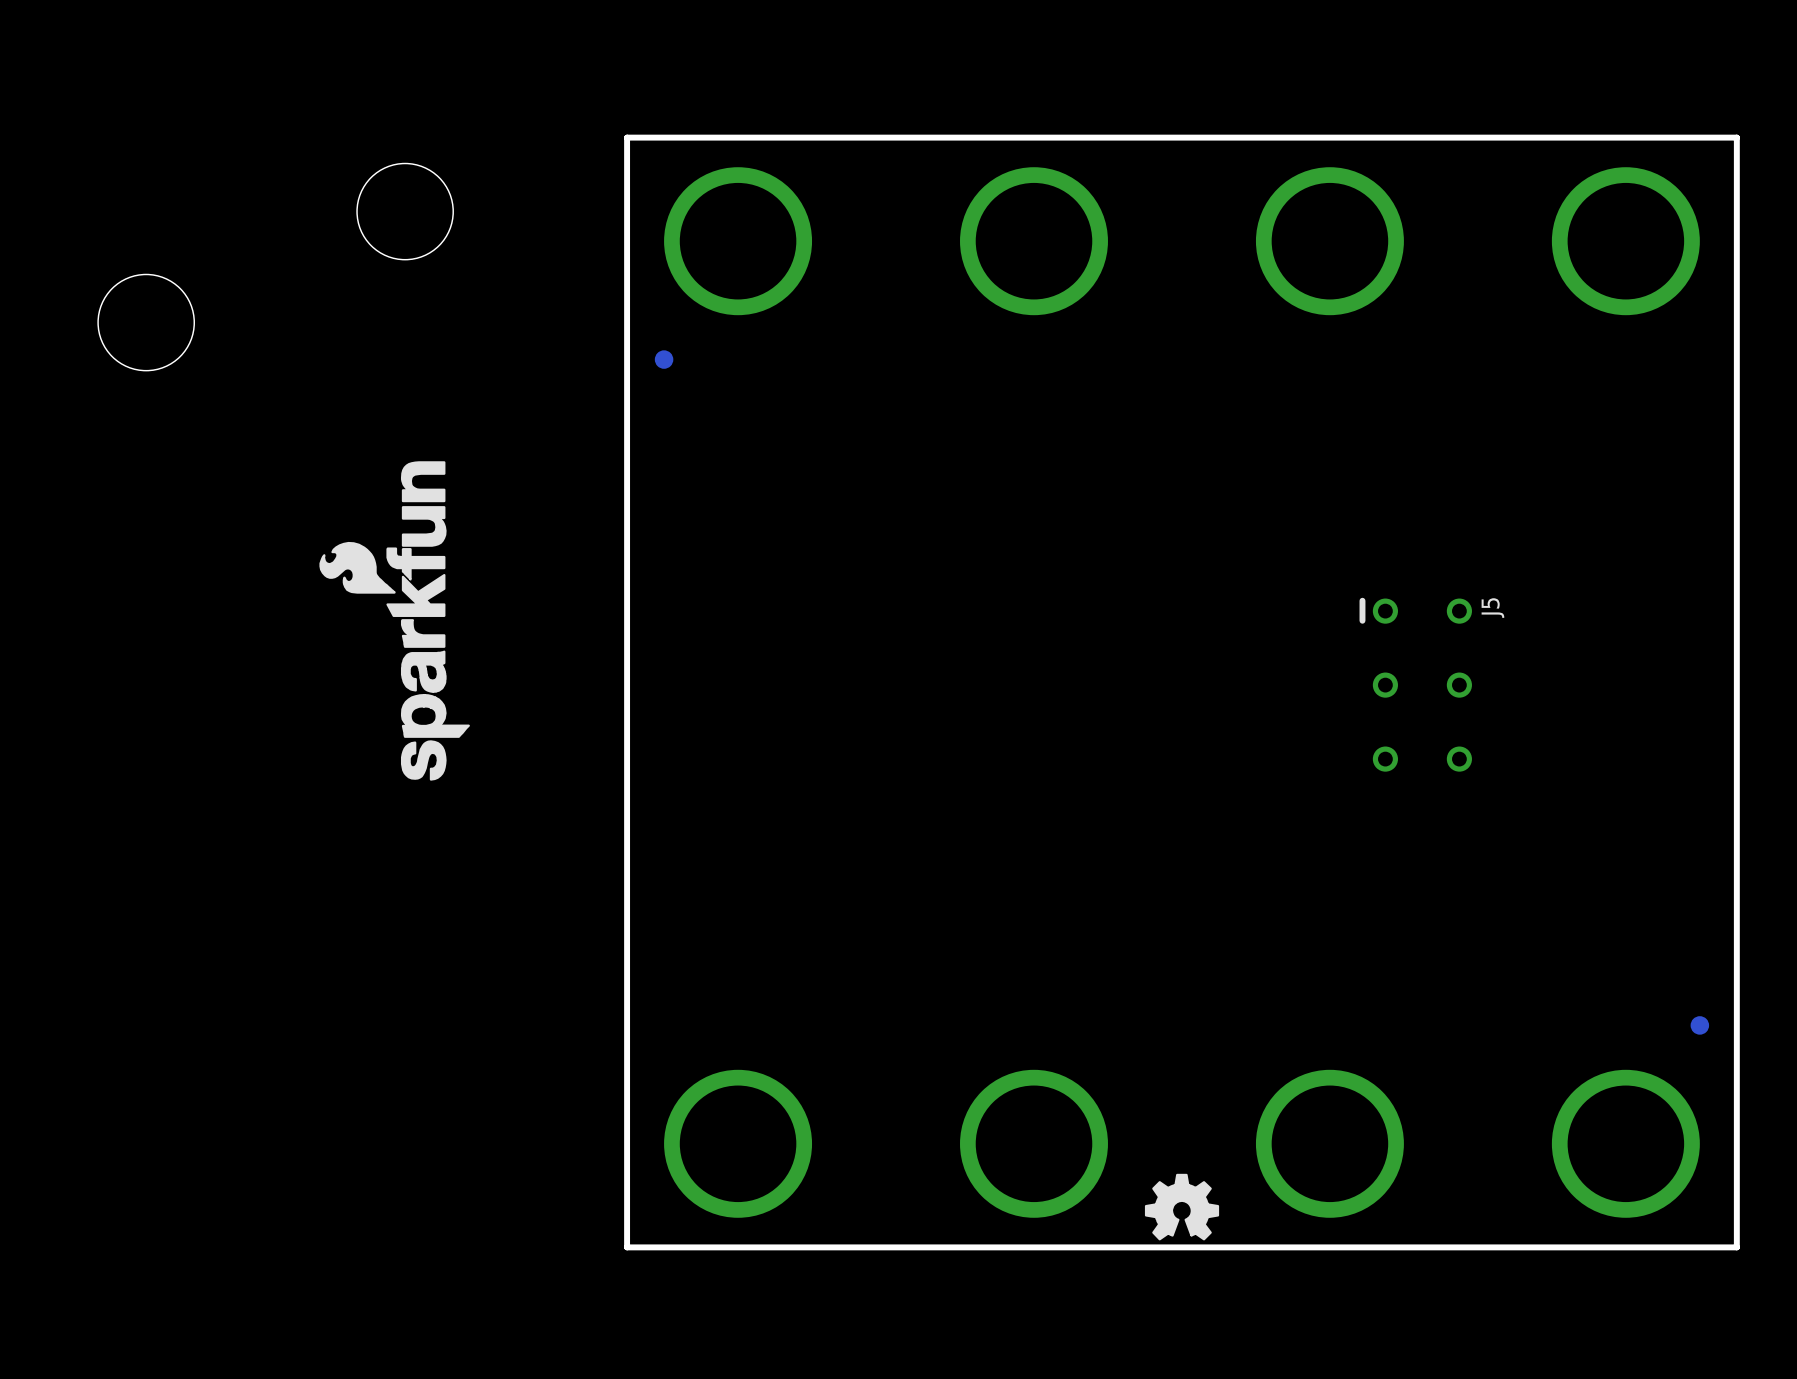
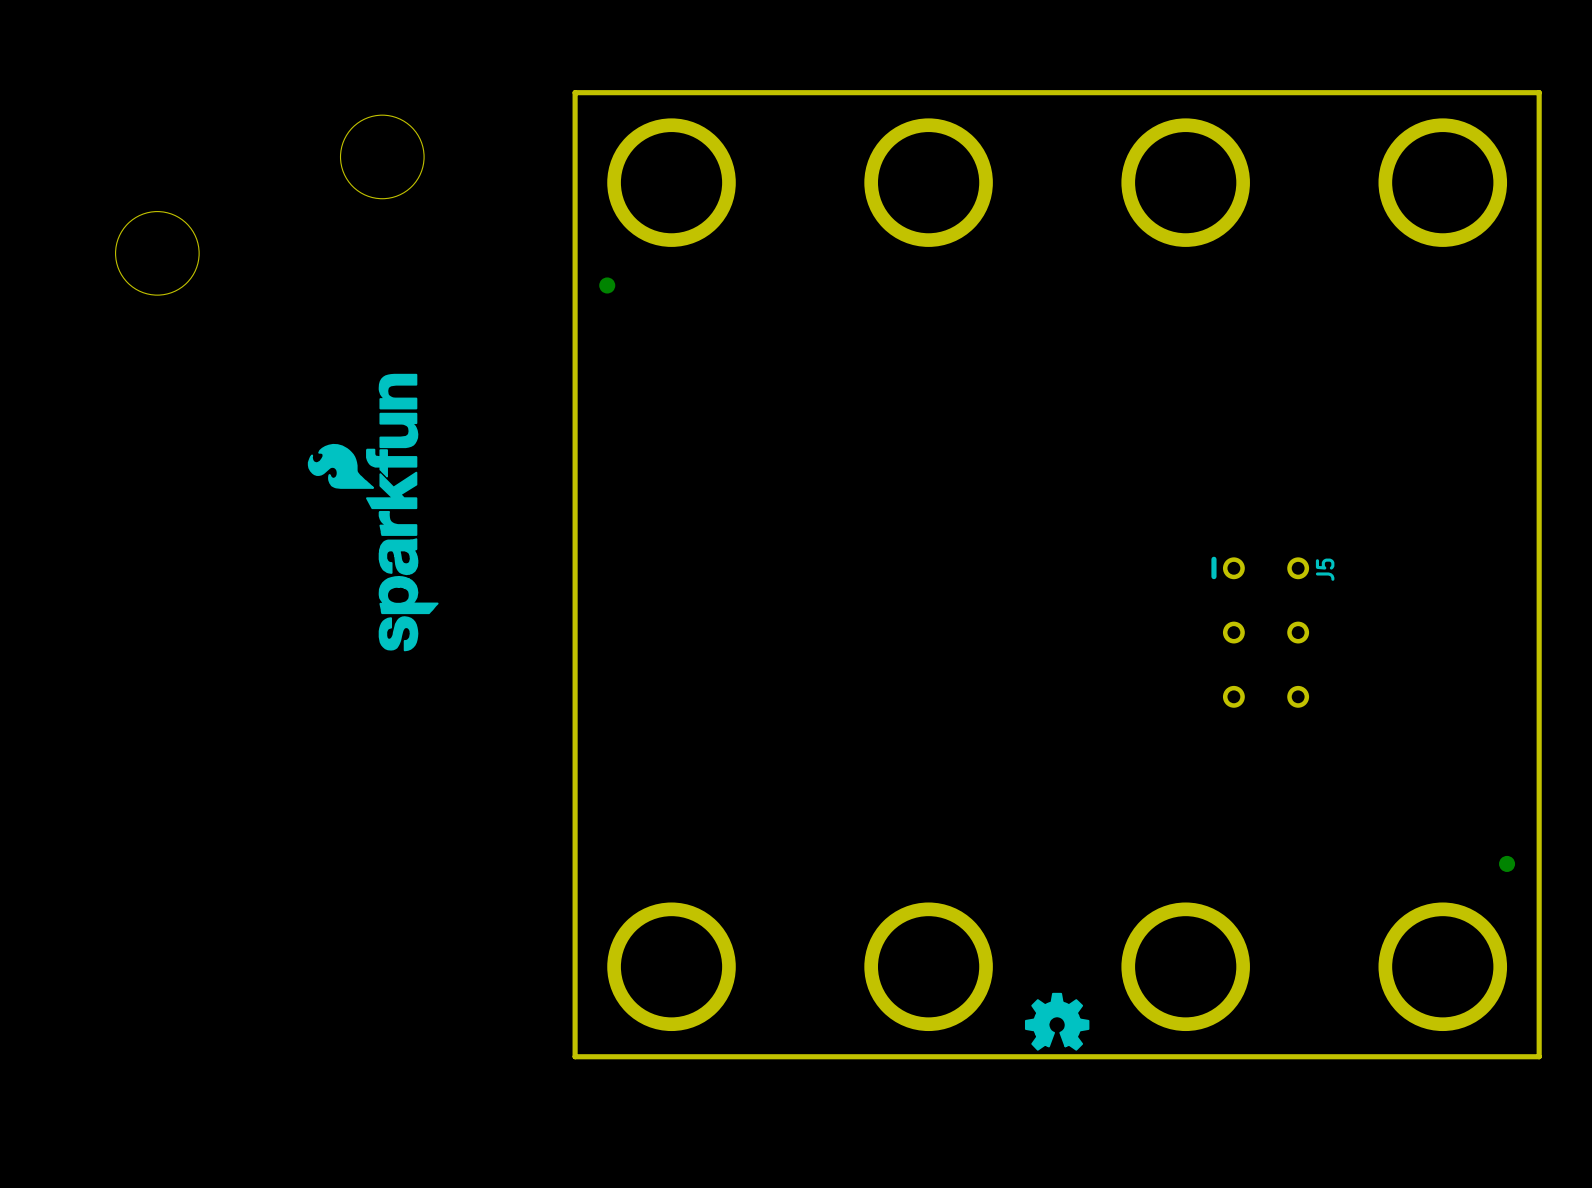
J5 position: (1415, 684) -> (1260, 632)

